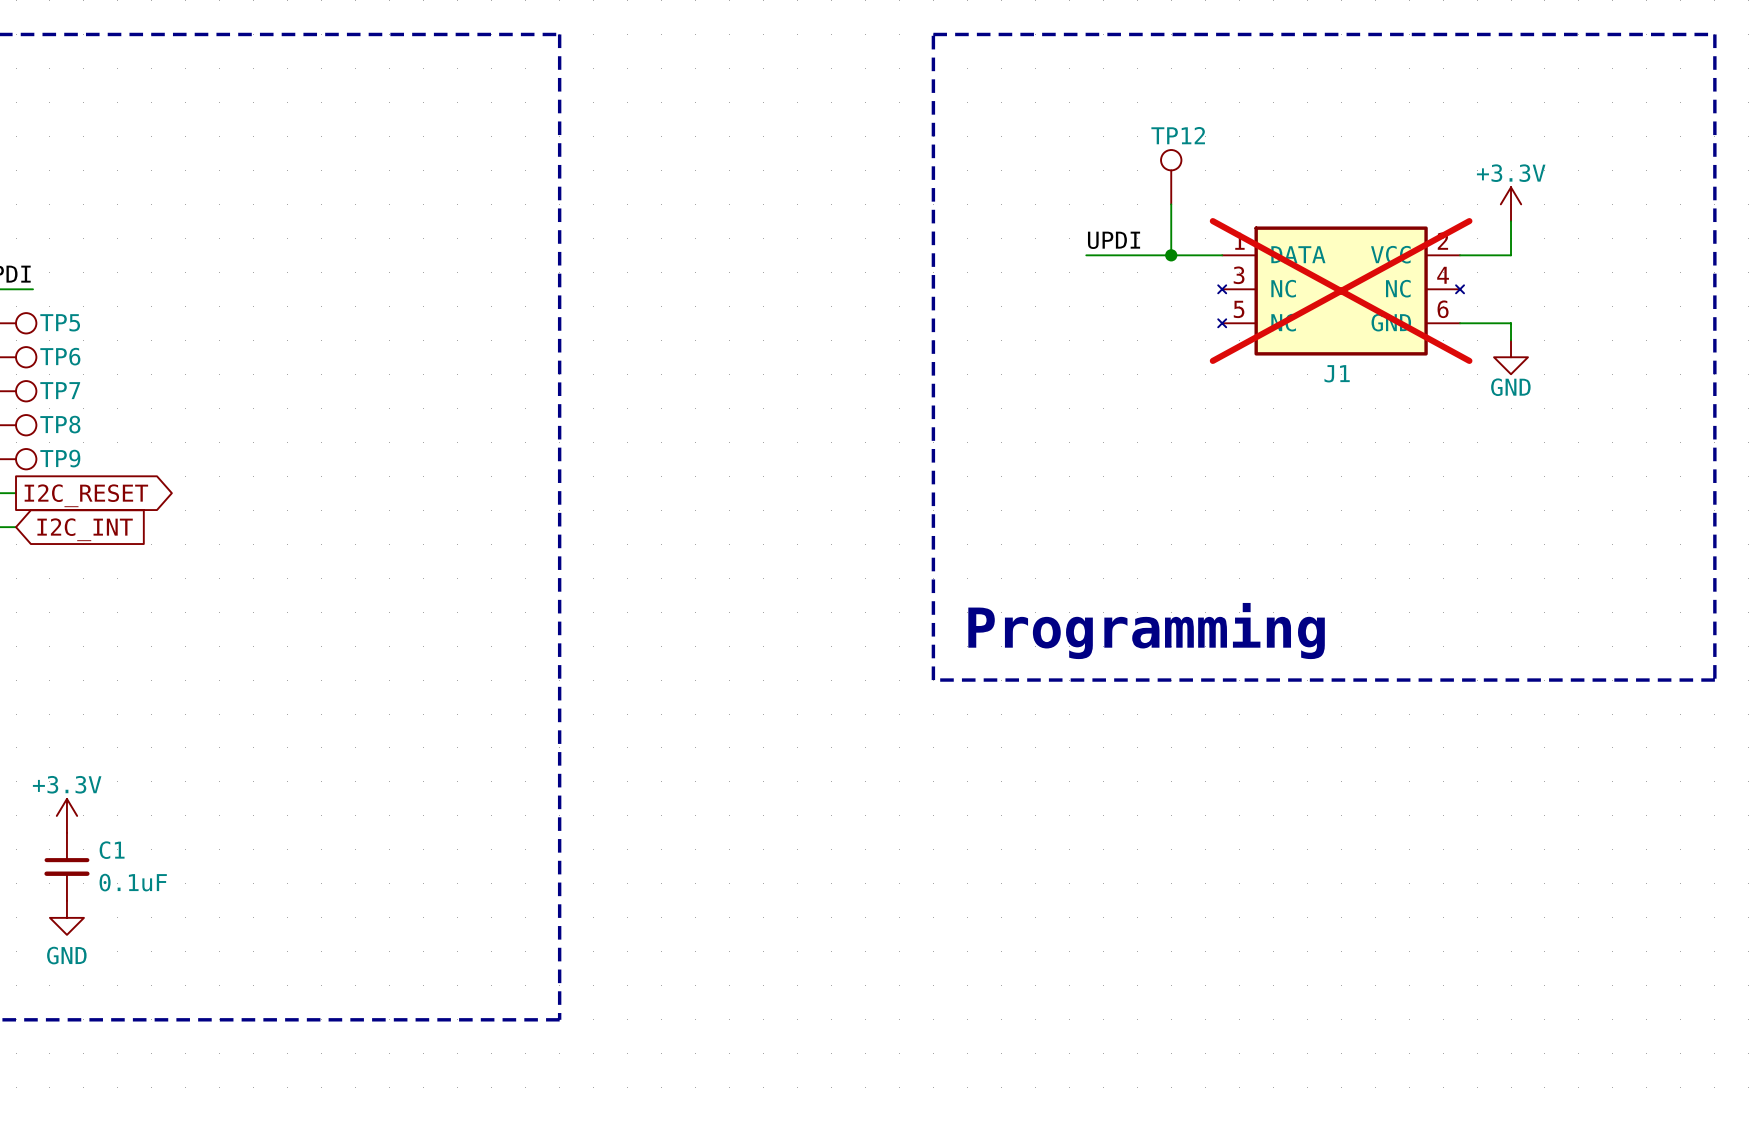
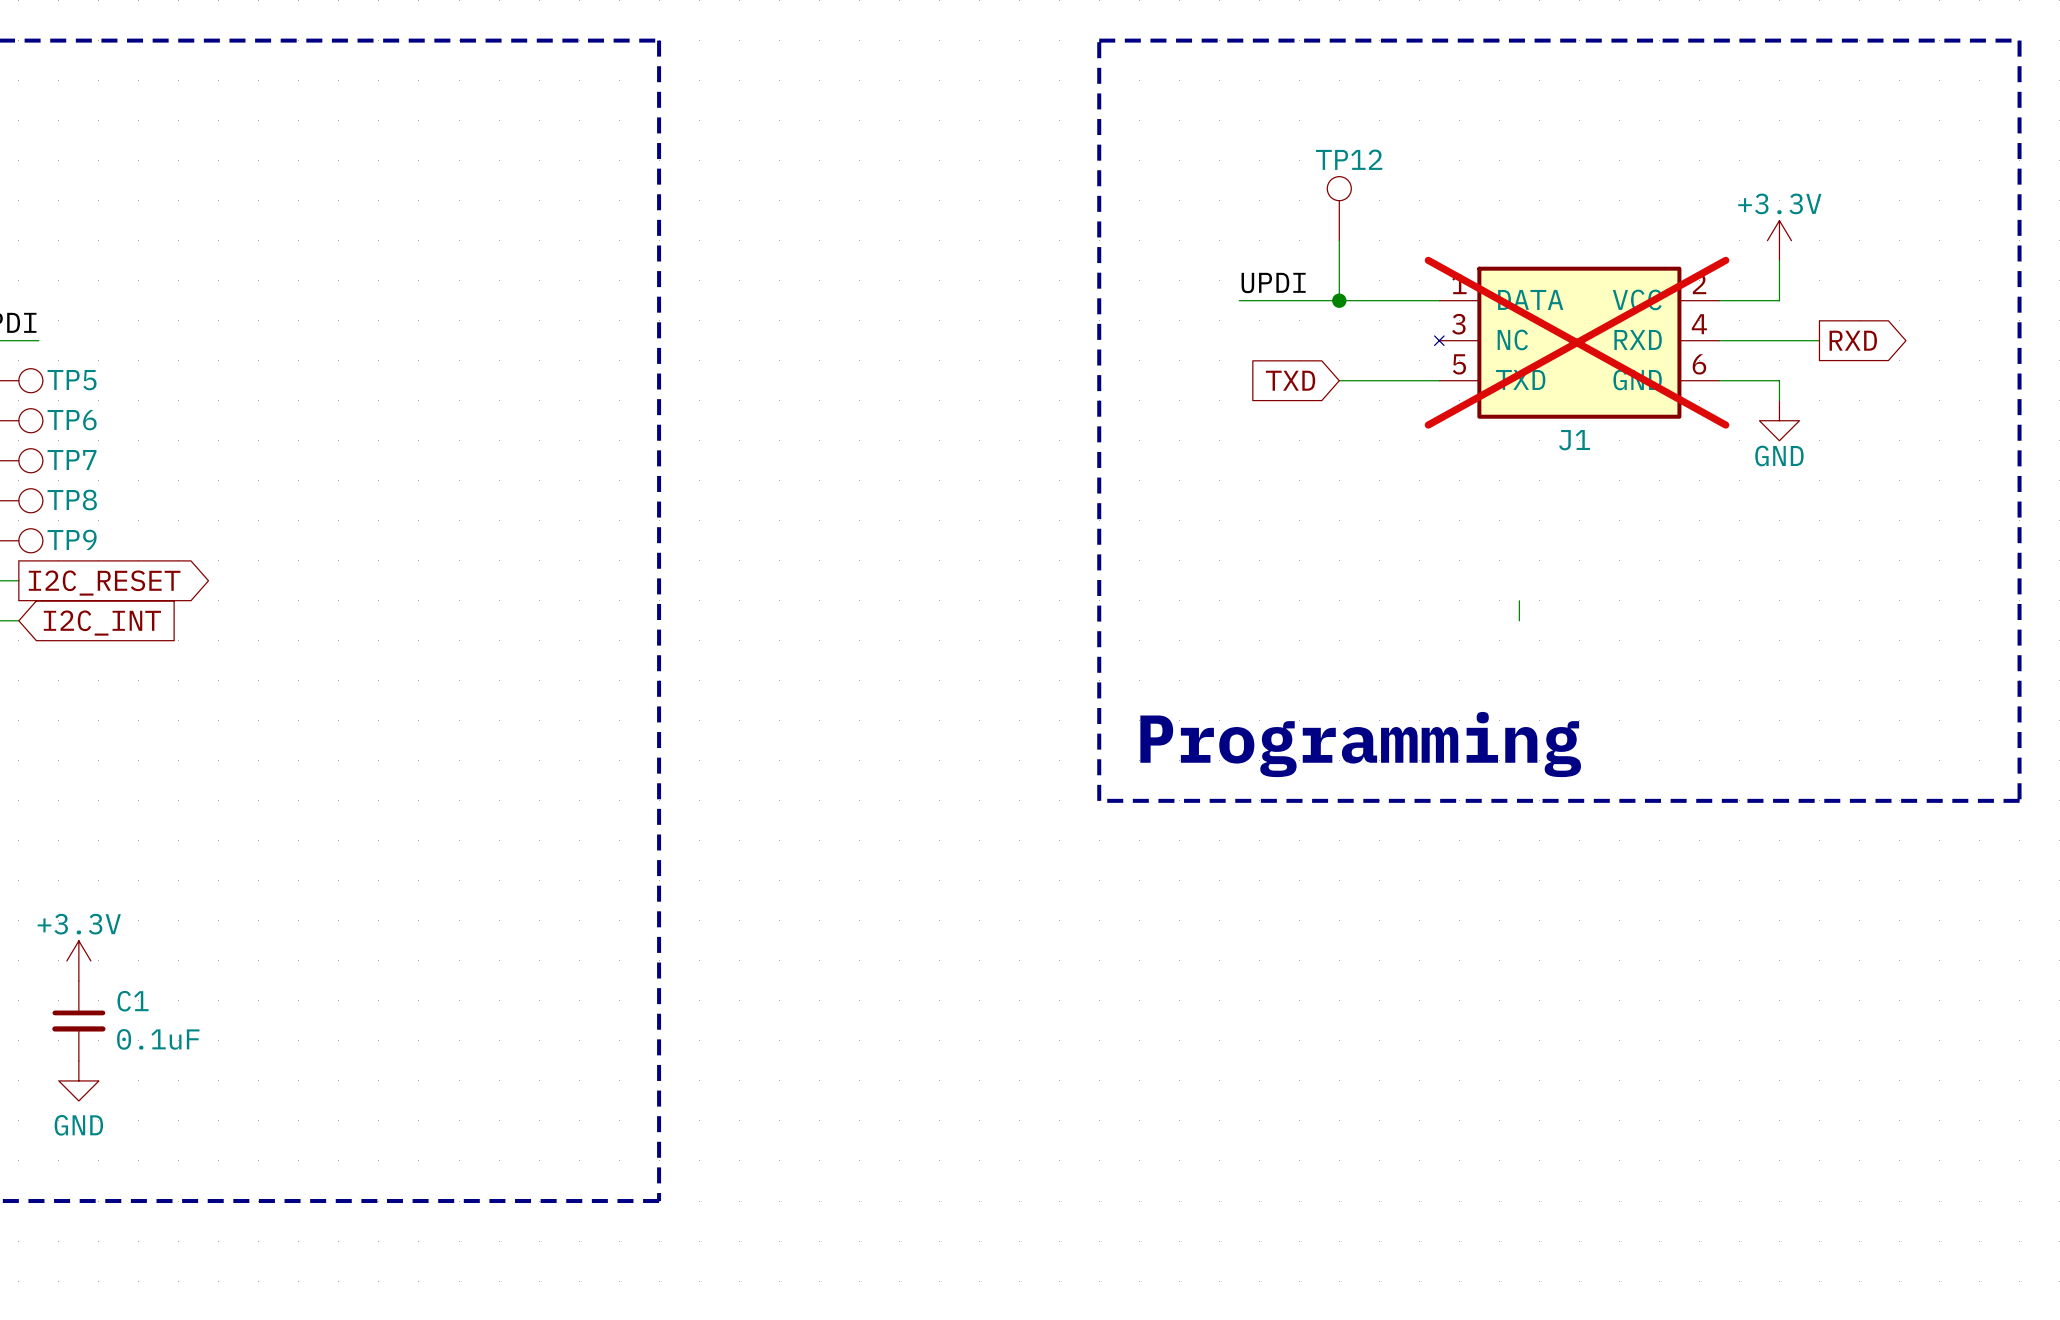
TP12 position: (1171, 177) -> (1339, 208)
wire: (1171, 204) (1171, 255) -> (1339, 240) (1339, 300)
J1 symbol: [1218, 226, 1465, 356] -> [1434, 266, 1720, 419]
label position: UPDI (1114, 240) -> UPDI (1273, 283)
wire: none -> (1239, 300) (1279, 300)
junction position: (1171, 255) -> (1339, 300)
wire: none -> (1719, 340) (1819, 340)
global label: none -> RXD (1853, 340)
global label: none -> TXD (1290, 380)
wire: none -> (1339, 380) (1439, 380)
wire: none -> (1519, 600) (1519, 620)

